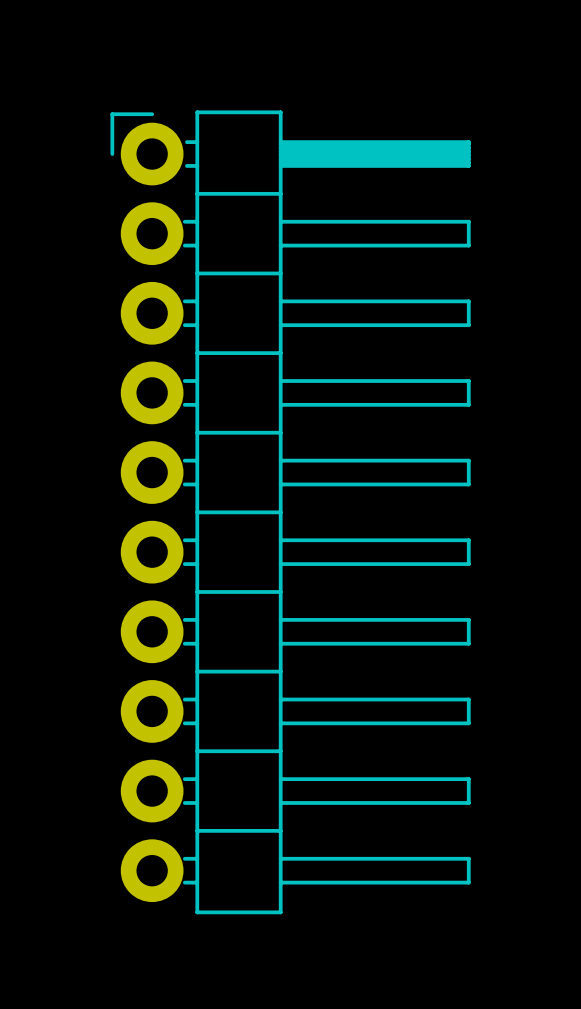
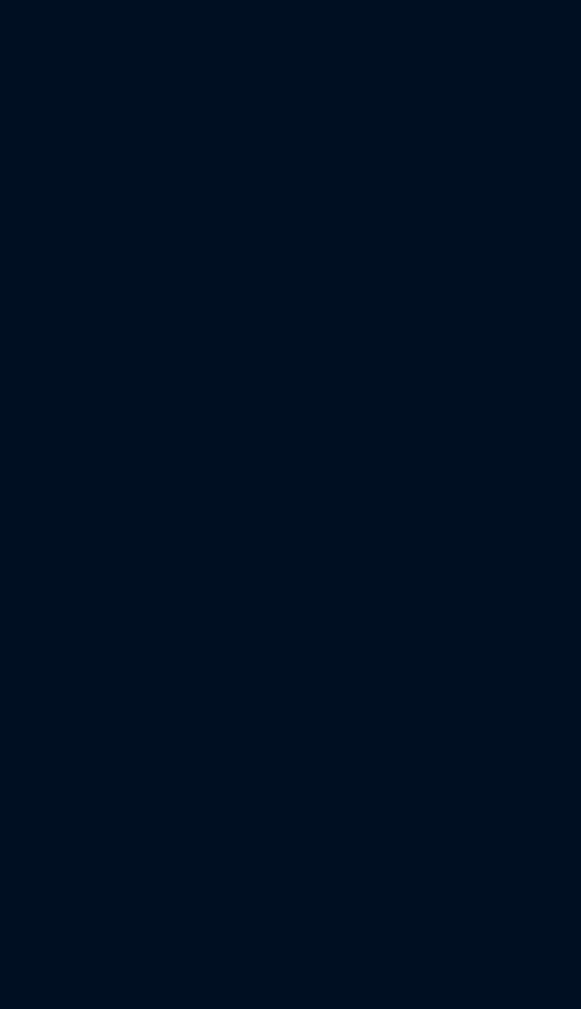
part: (290, 512) -> none

